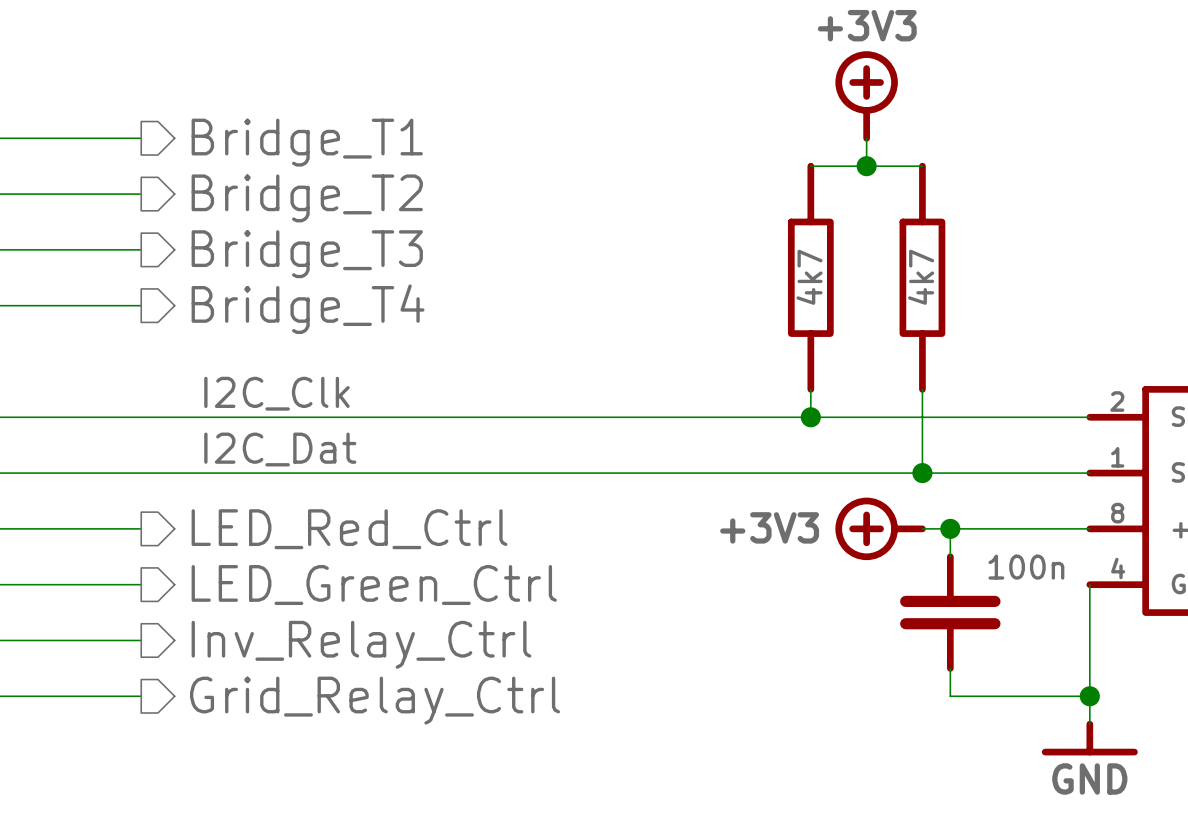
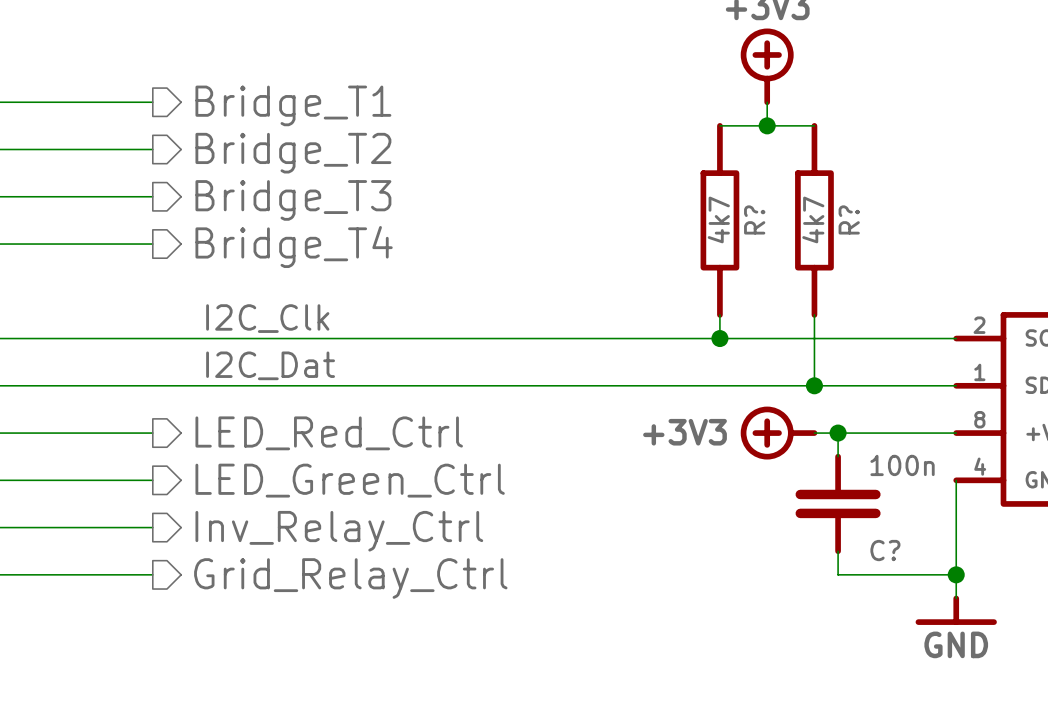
R? name: none -> R? (754, 219)
R? name: none -> R? (849, 219)
C? name: none -> C? (885, 550)

